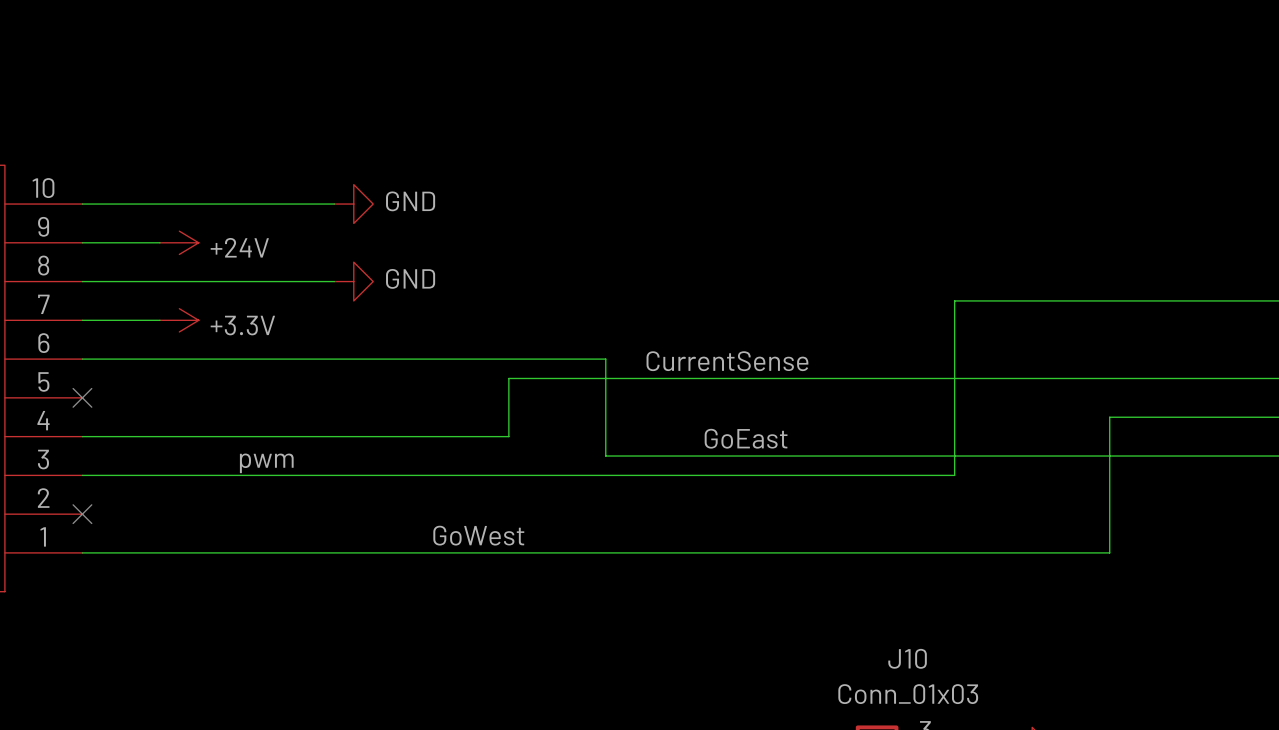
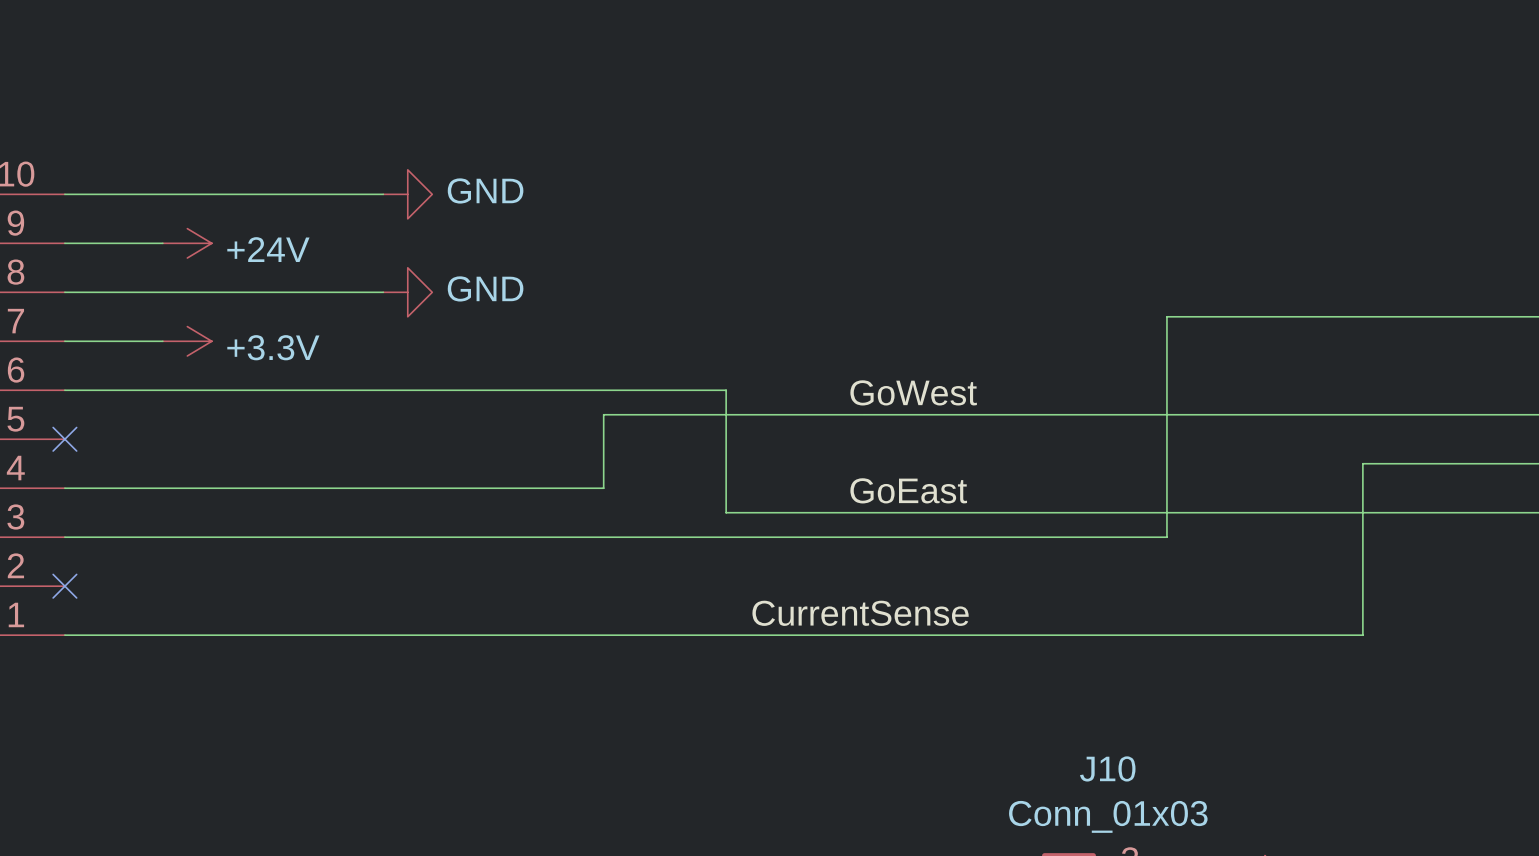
label position: CurrentSense (727, 361) -> CurrentSense (860, 613)
label: pwm (266, 463) -> none
label position: GoWest (478, 535) -> GoWest (913, 392)

